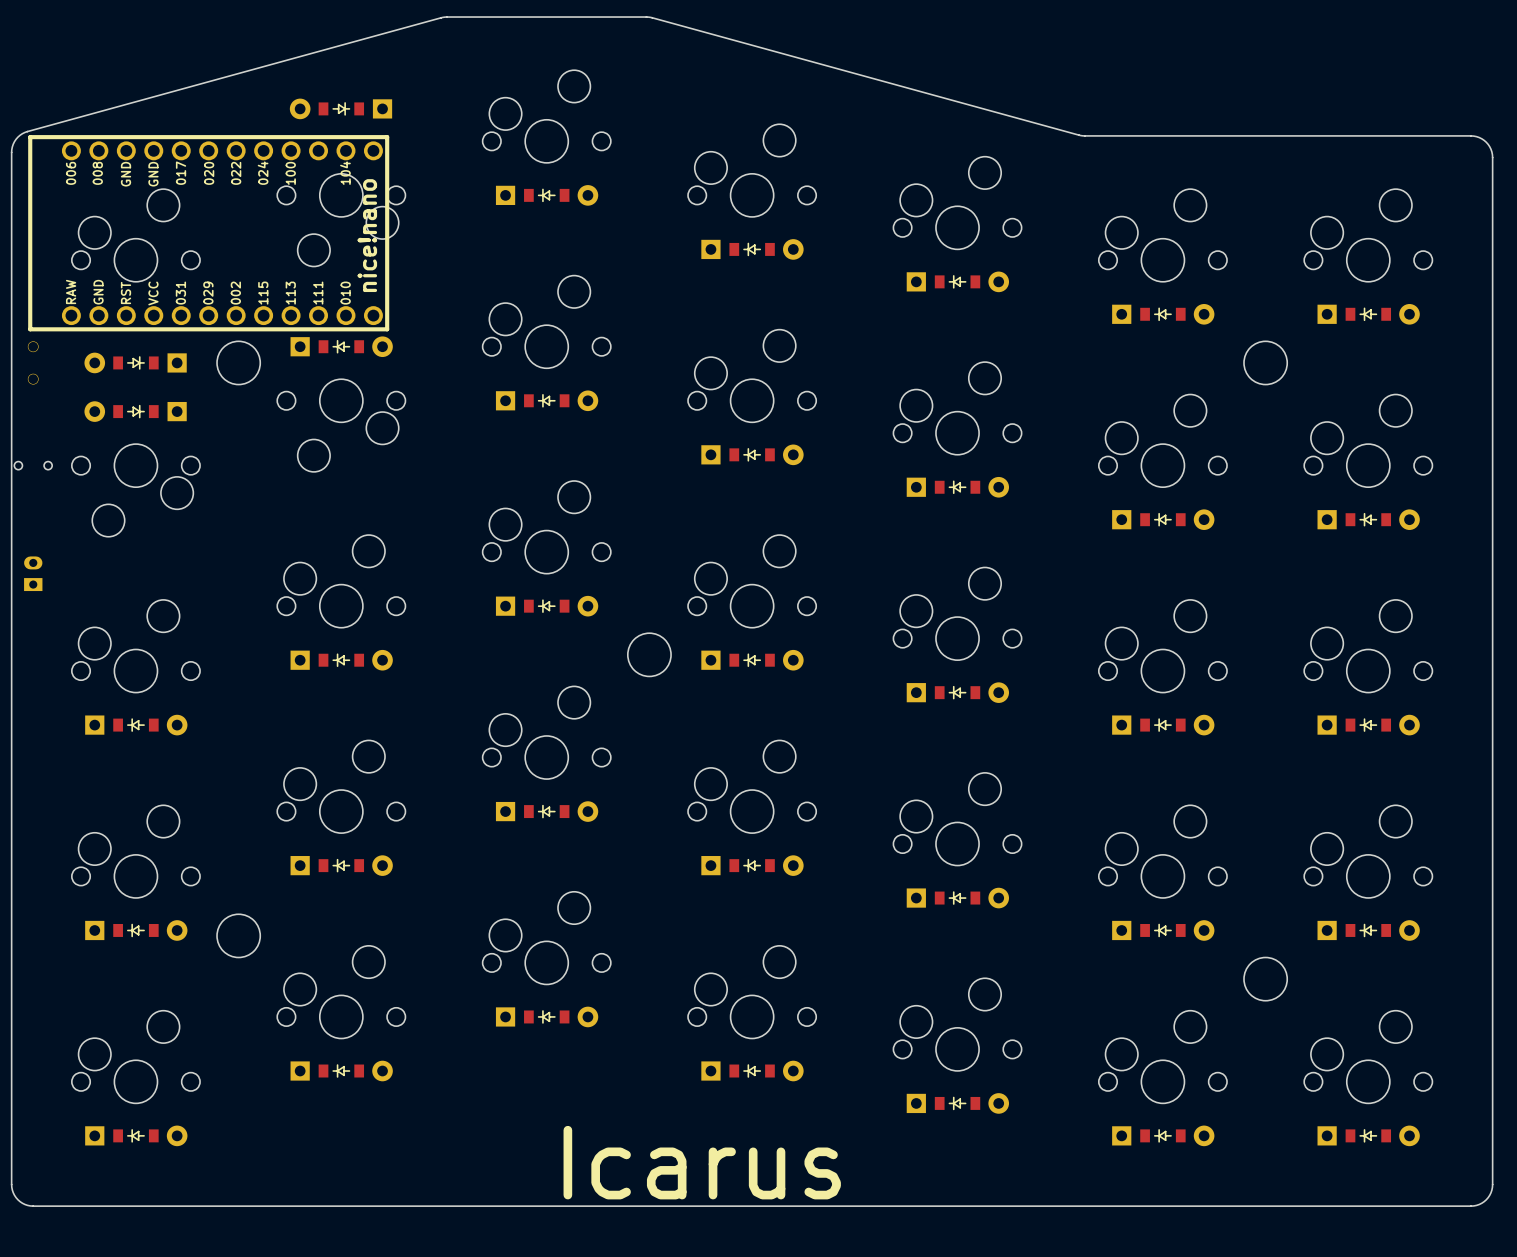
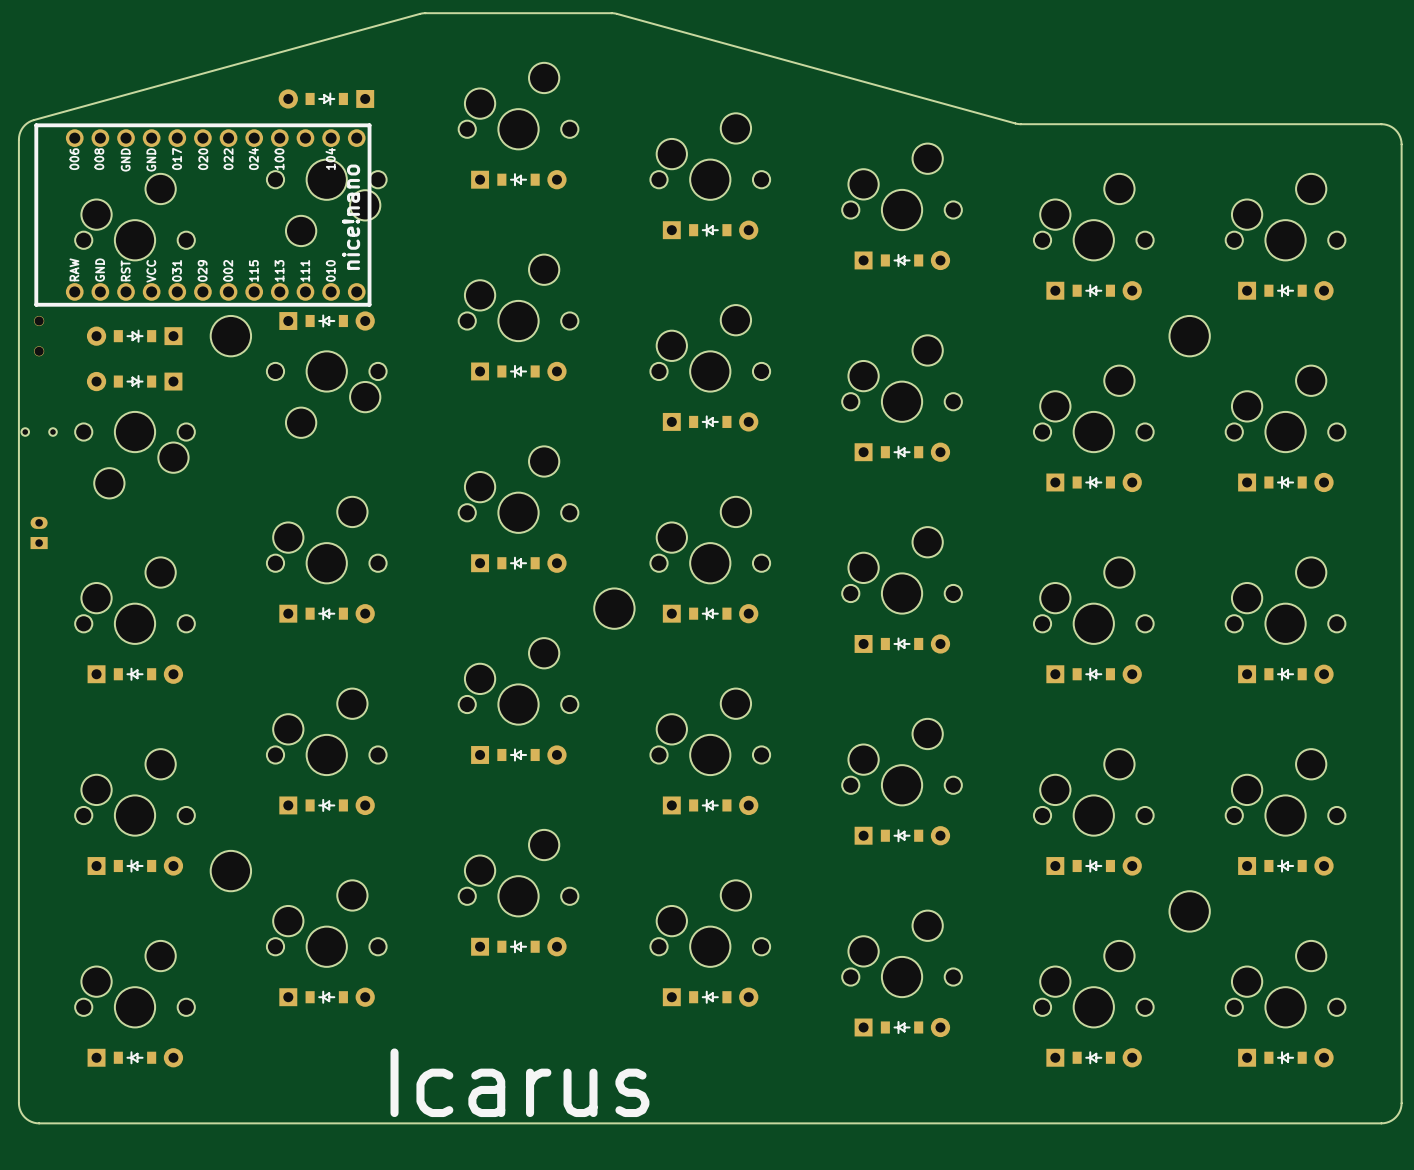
text position: Icarus (702, 1162) -> Icarus (519, 1082)

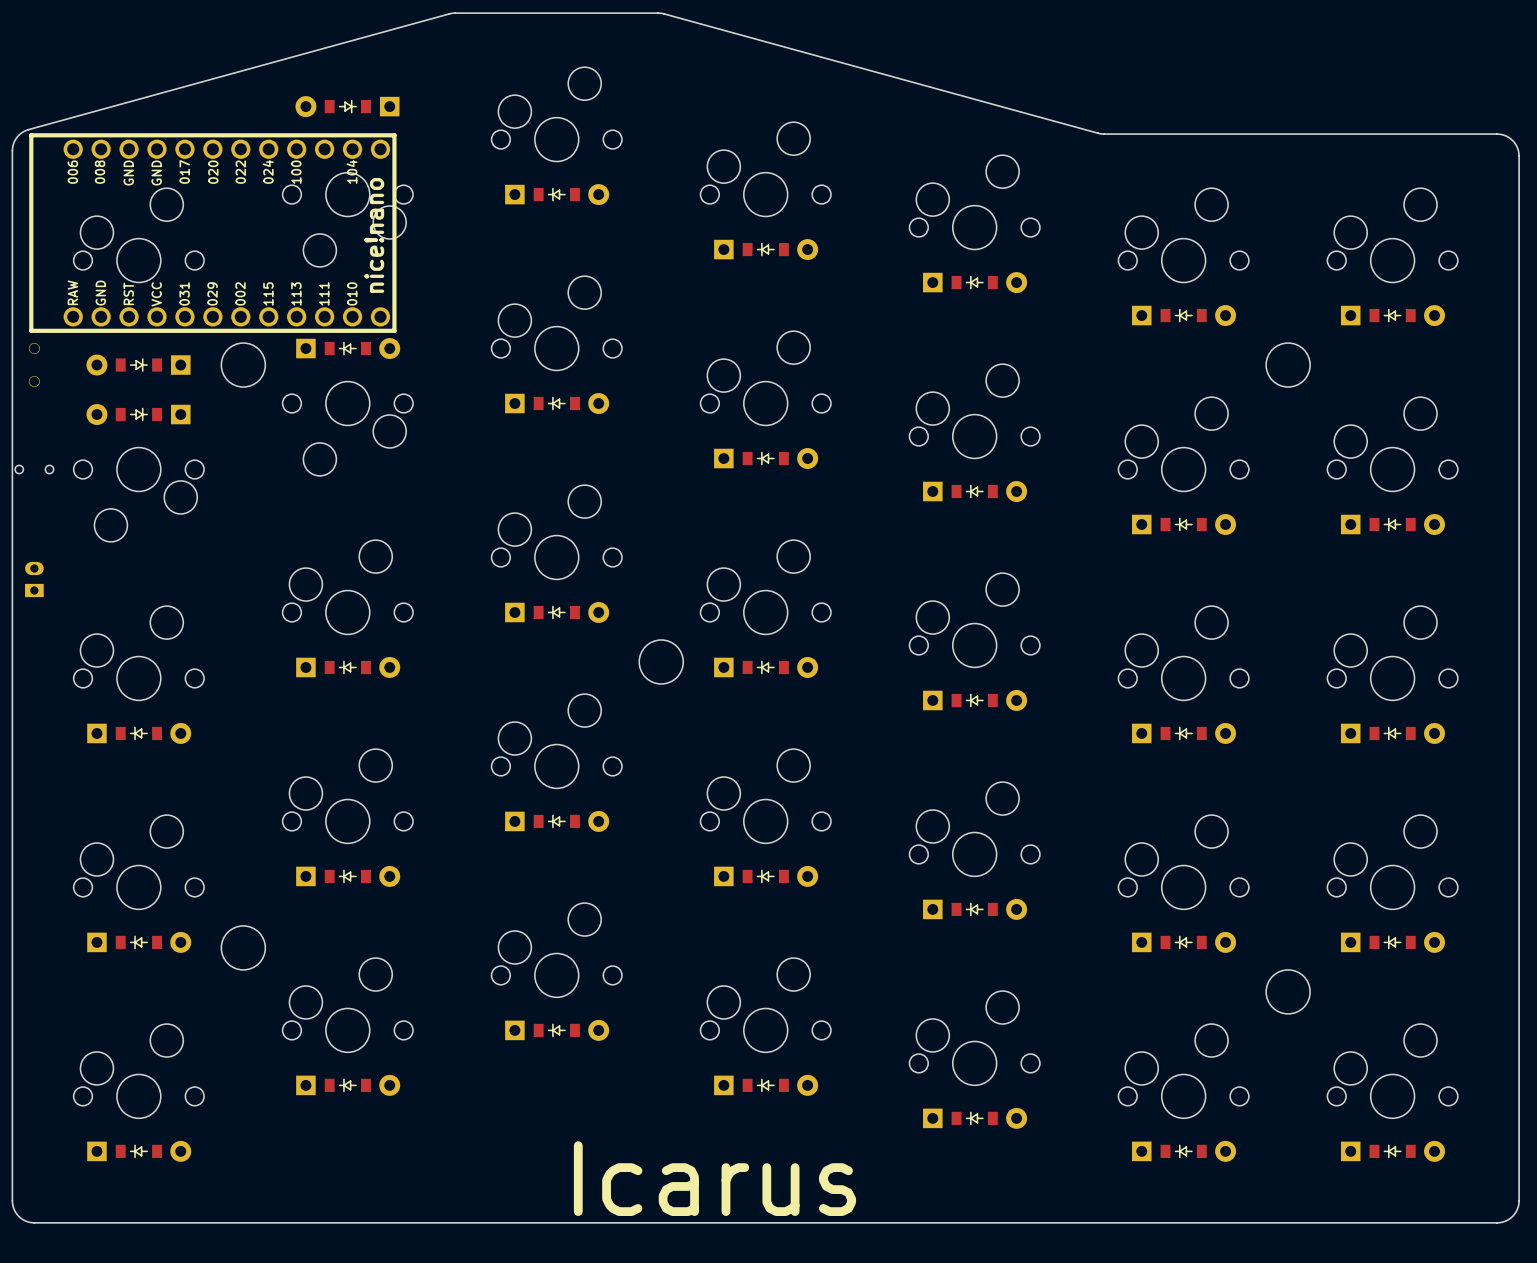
text position: Icarus (519, 1082) -> Icarus (714, 1178)

